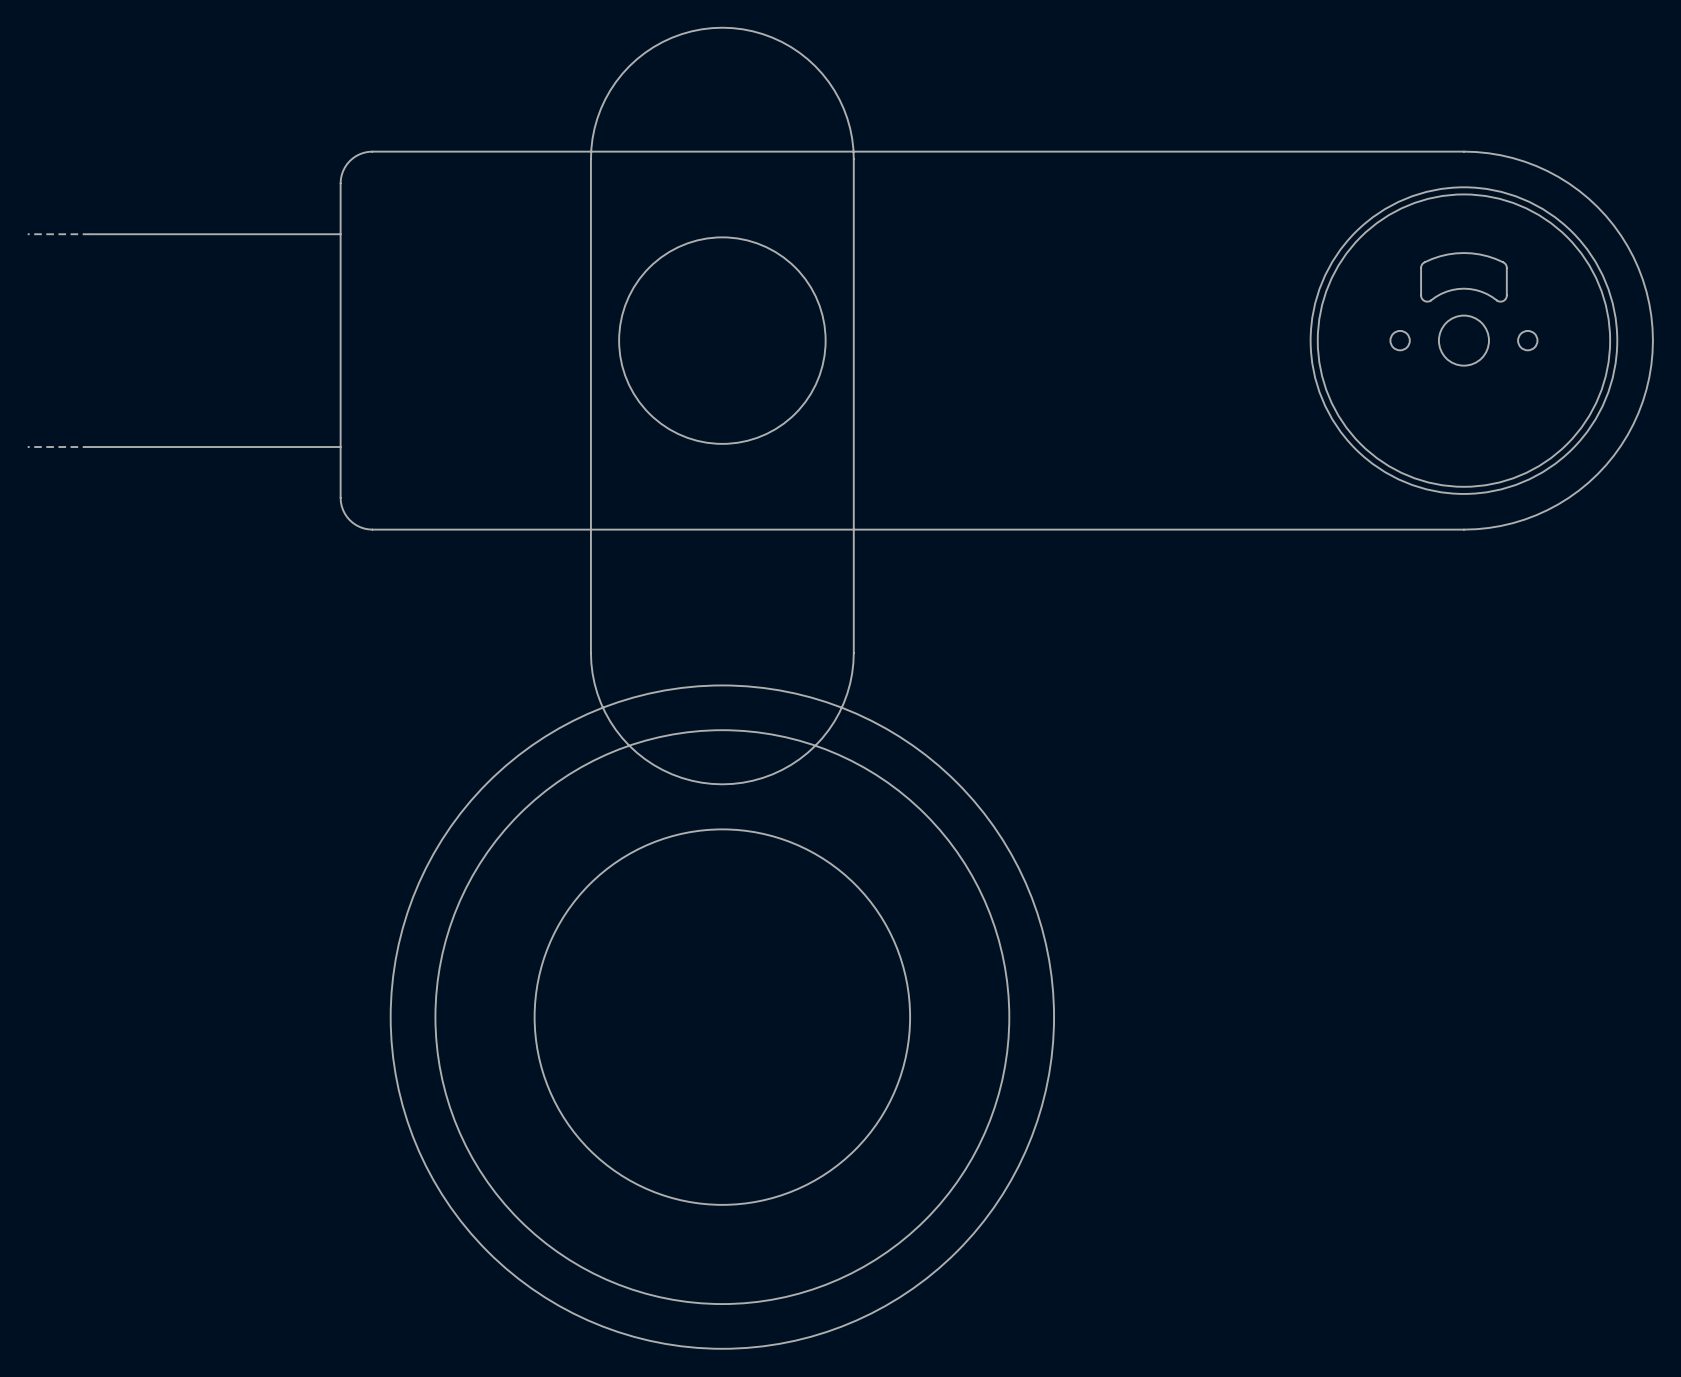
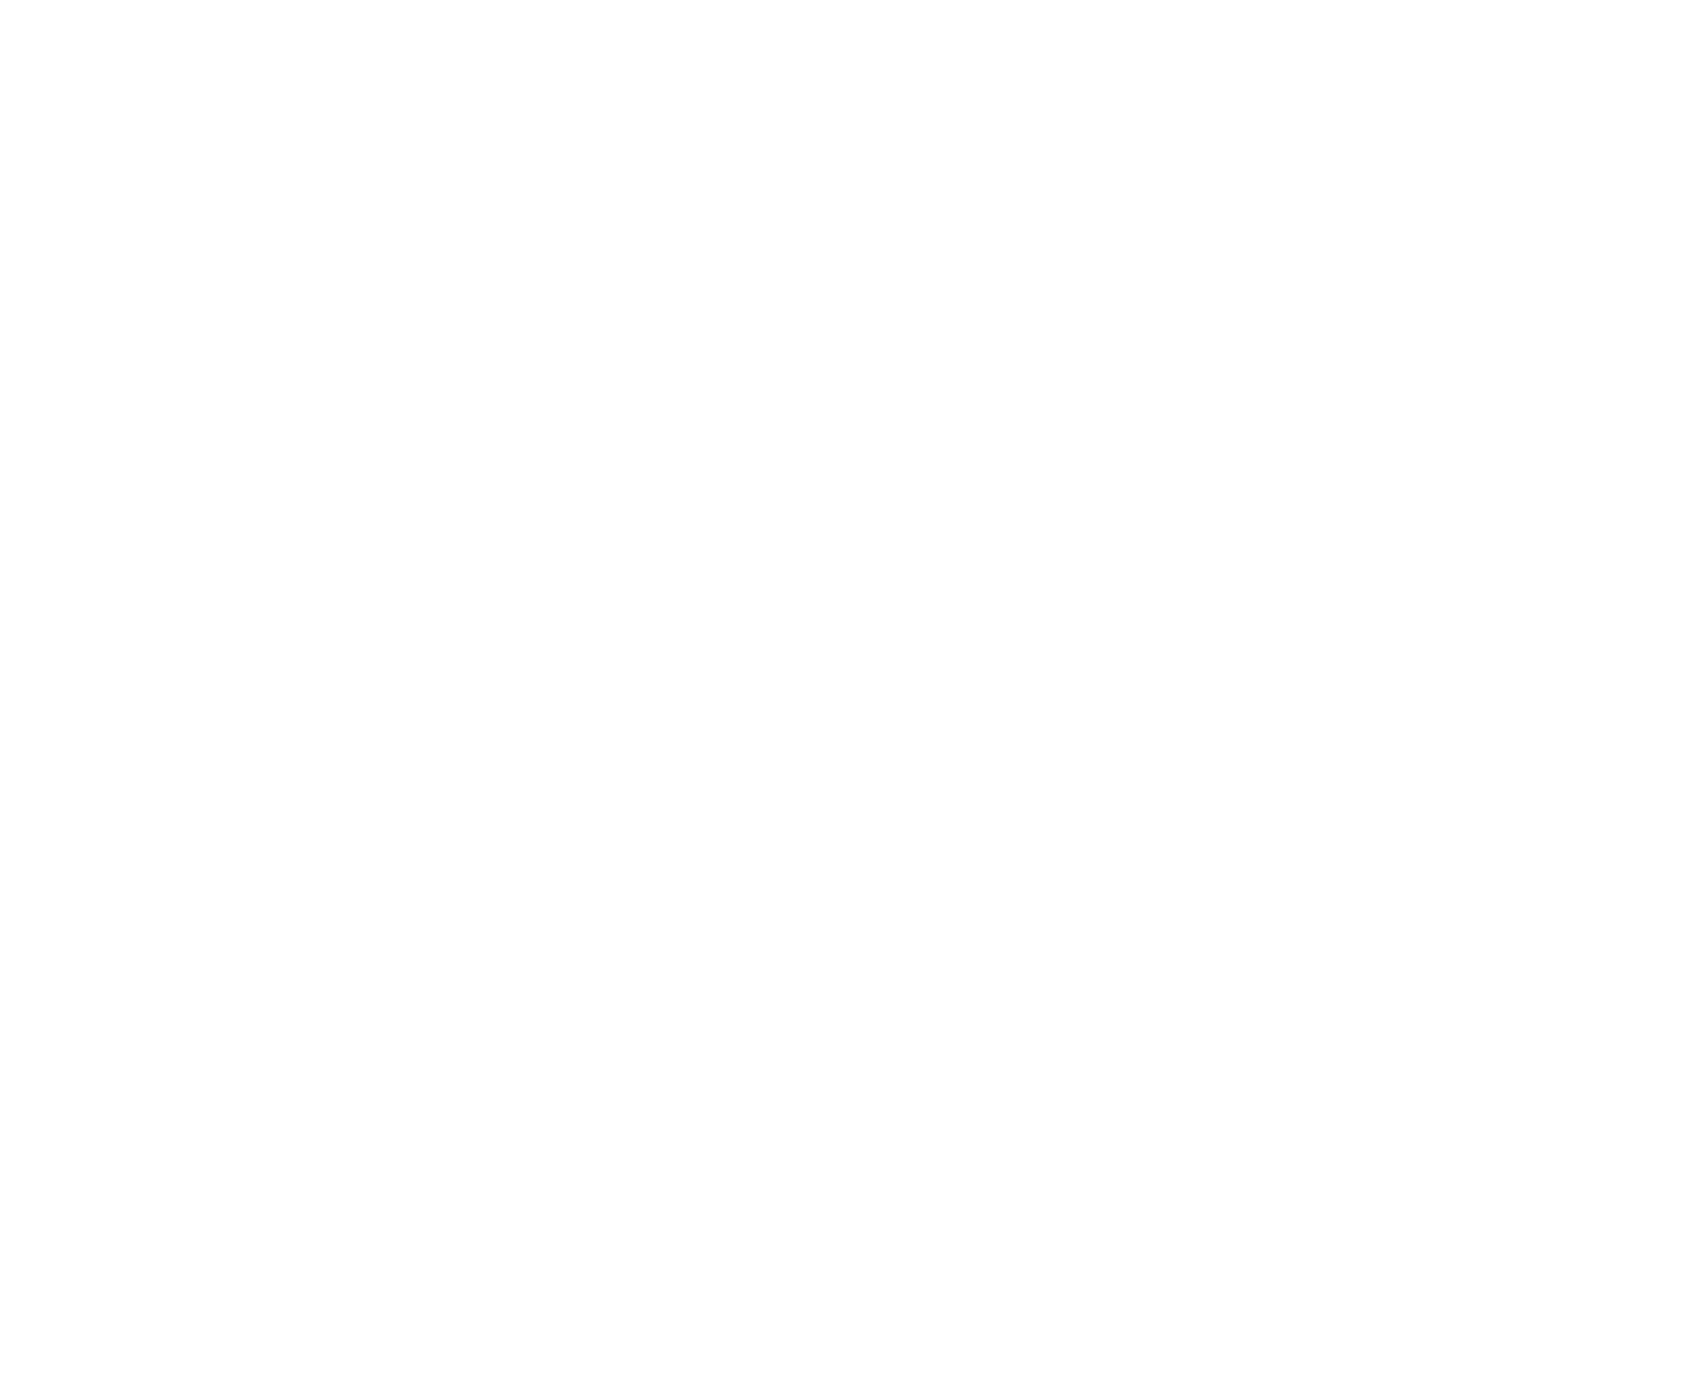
line: (372, 151) (1463, 151) (1500, 155) (1536, 166) (1568, 183) (1597, 206) (1621, 235) (1638, 268) (1649, 303) (1652, 340) (1649, 377) (1642, 401) (1633, 424) (1621, 445) (1597, 474) (1568, 497) (1547, 510) (1512, 523) (1488, 528) (1463, 529) (368, 529) (360, 527) (349, 520) (344, 513) (340, 501) (340, 183) (343, 171) (349, 160) (360, 154) (372, 151) -> none
line: (590, 159) (590, 652) (594, 683) (600, 703) (616, 730) (629, 745) (653, 764) (681, 777) (701, 782) (722, 784) (753, 780) (772, 774) (791, 764) (815, 745) (828, 730) (839, 712) (847, 693) (852, 673) (853, 652) (853, 159) (850, 128) (843, 108) (828, 81) (815, 66) (799, 52) (782, 42) (753, 31) (722, 27) (701, 29) (681, 34) (662, 42) (637, 59) (622, 73) (610, 90) (600, 108) (592, 138) (590, 159) -> none
drawing: [1310, 186, 1618, 495] -> none
line: (27, 234) (340, 234) -> none
drawing: [618, 237, 826, 445] -> none
line: (1424, 262) (1421, 267) (1421, 295) (1425, 301) (1429, 301) (1446, 291) (1463, 288) (1481, 291) (1499, 301) (1503, 300) (1506, 297) (1506, 266) (1504, 262) (1495, 258) (1472, 253) (1455, 253) (1424, 262) -> none
line: (27, 447) (340, 447) -> none
drawing: [390, 685, 1055, 1350] -> none

